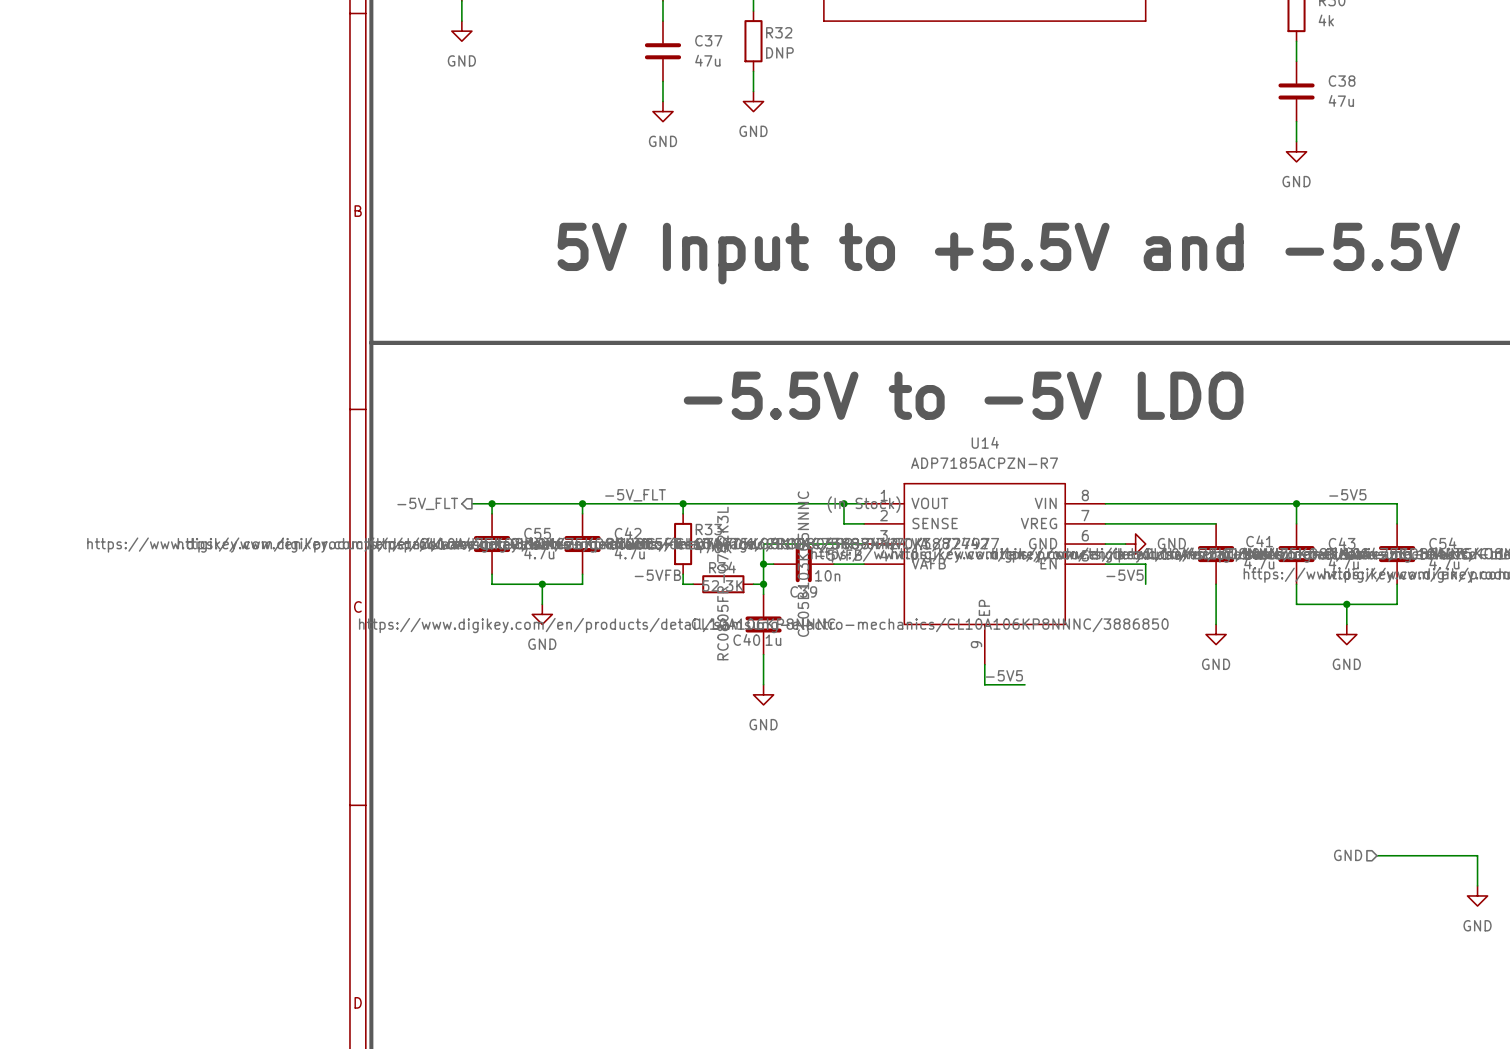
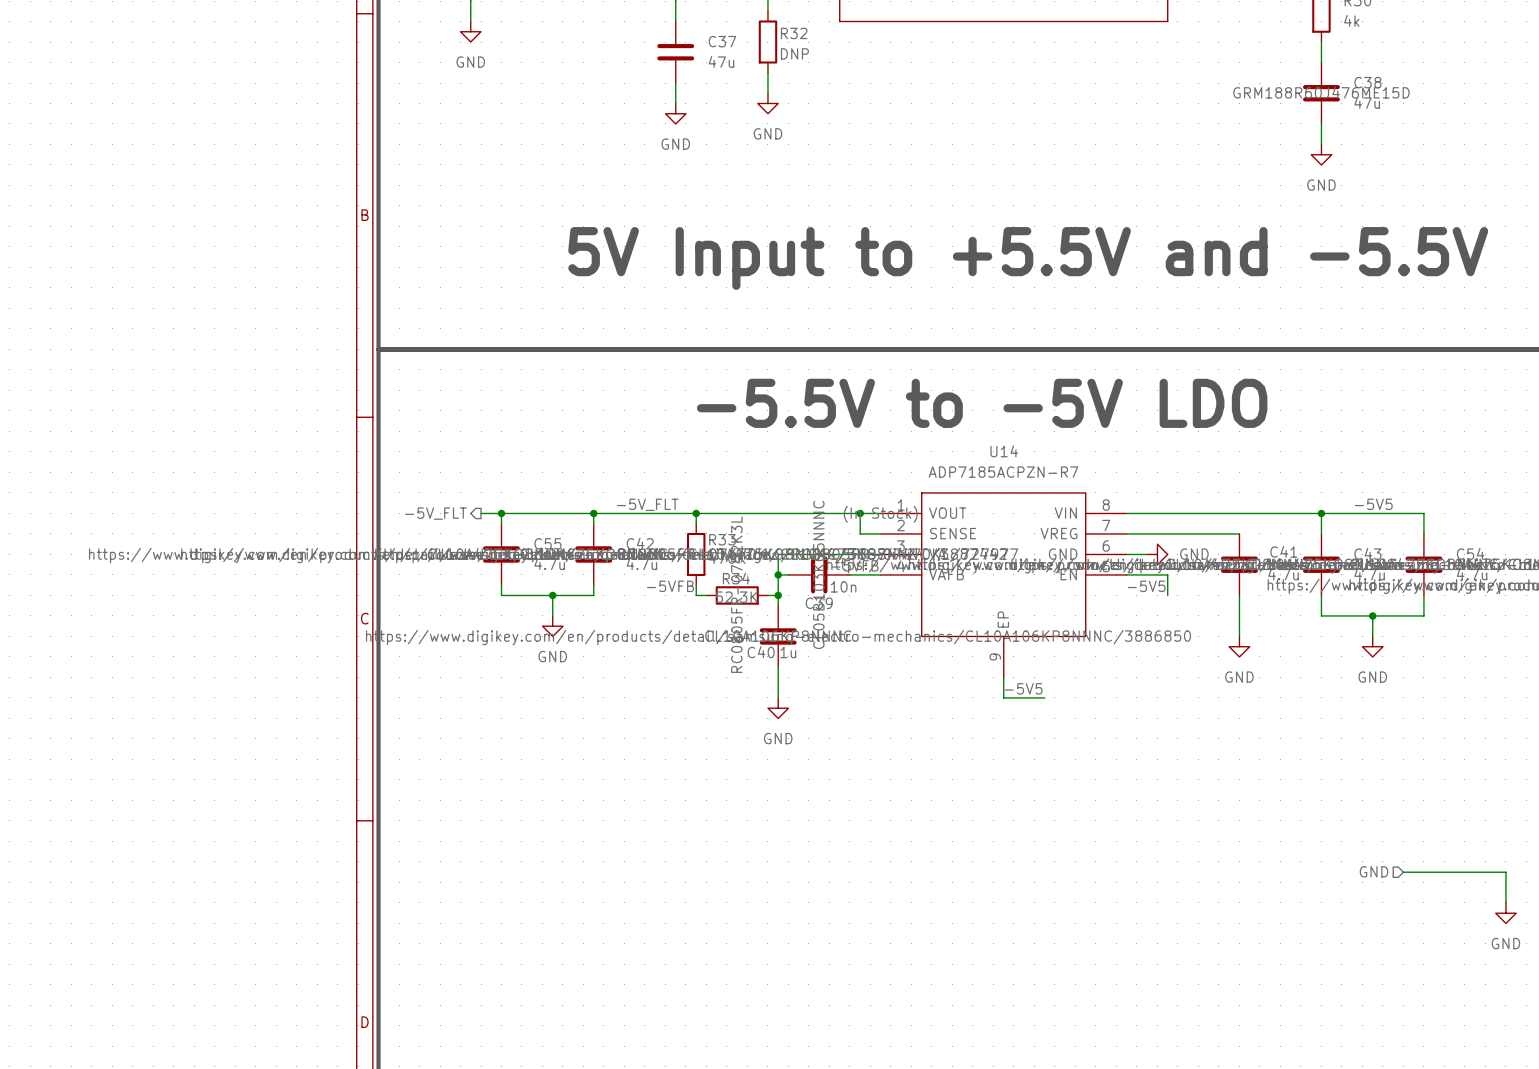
C38 text: none -> GRM188R60J476ME15D (1321, 92)

